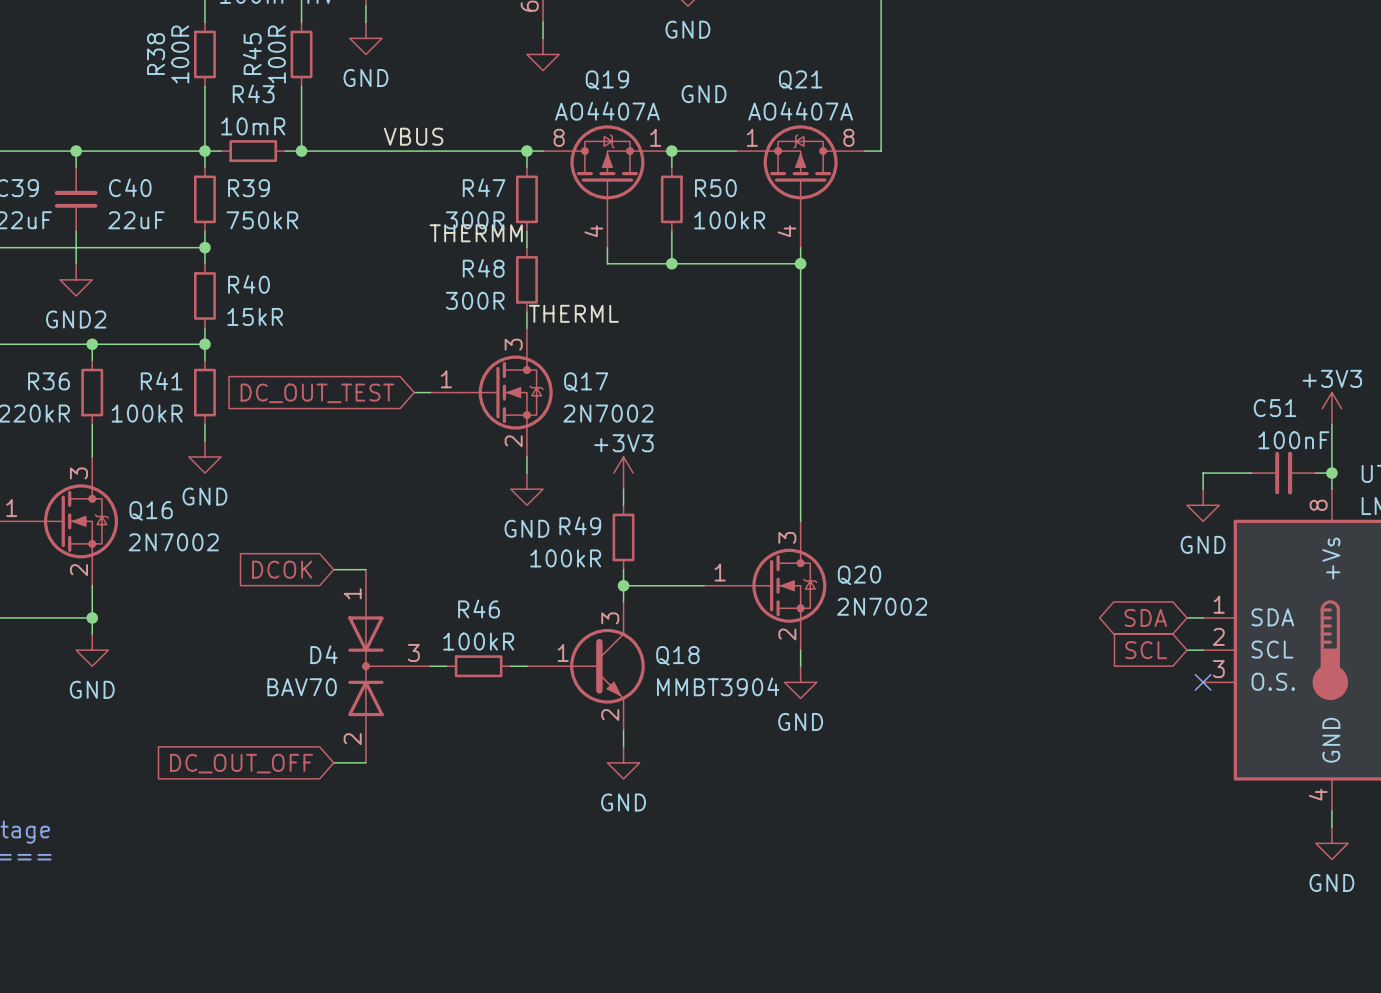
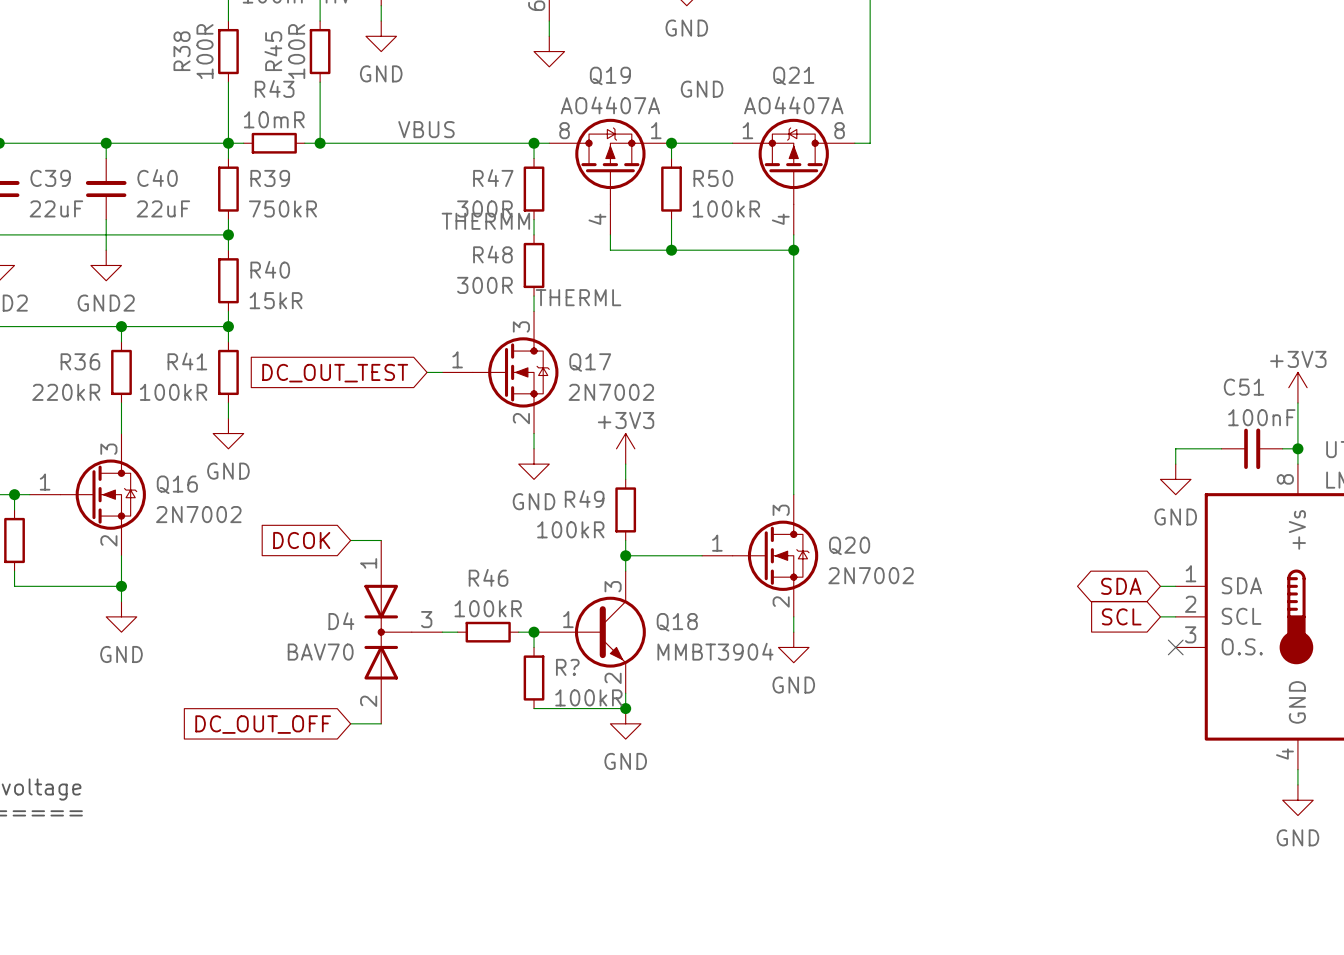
wire: none -> (534, 632) (534, 647)
junction: none -> (534, 632)
R?: none -> 100kR (534, 678)
wire: none -> (534, 708) (625, 708)
junction: none -> (625, 708)

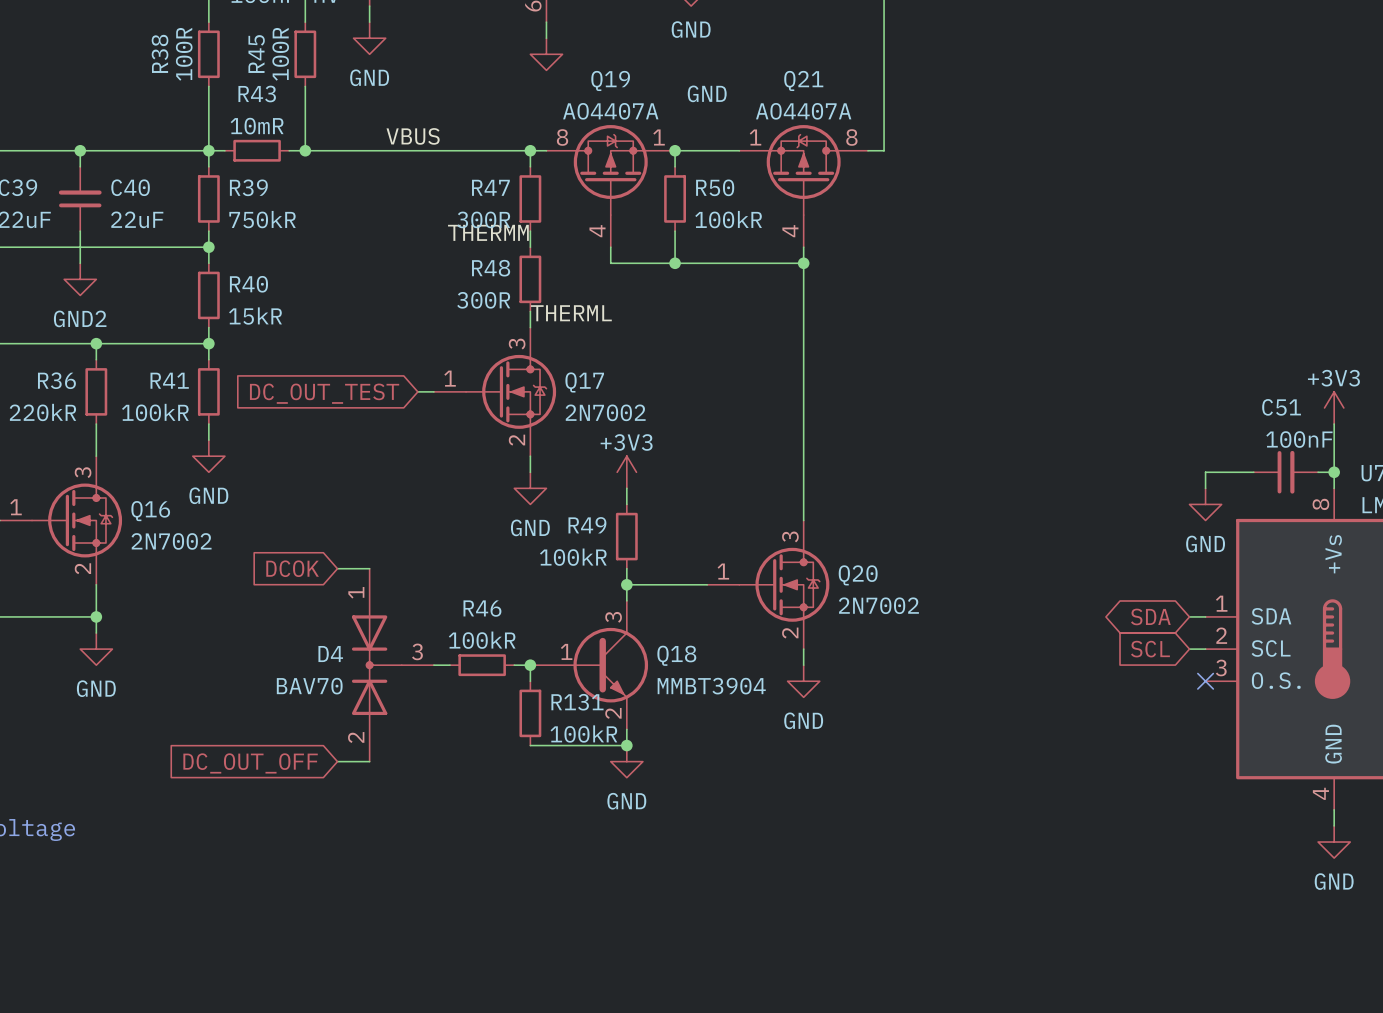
R? name: R? (567, 667) -> R131 (577, 702)

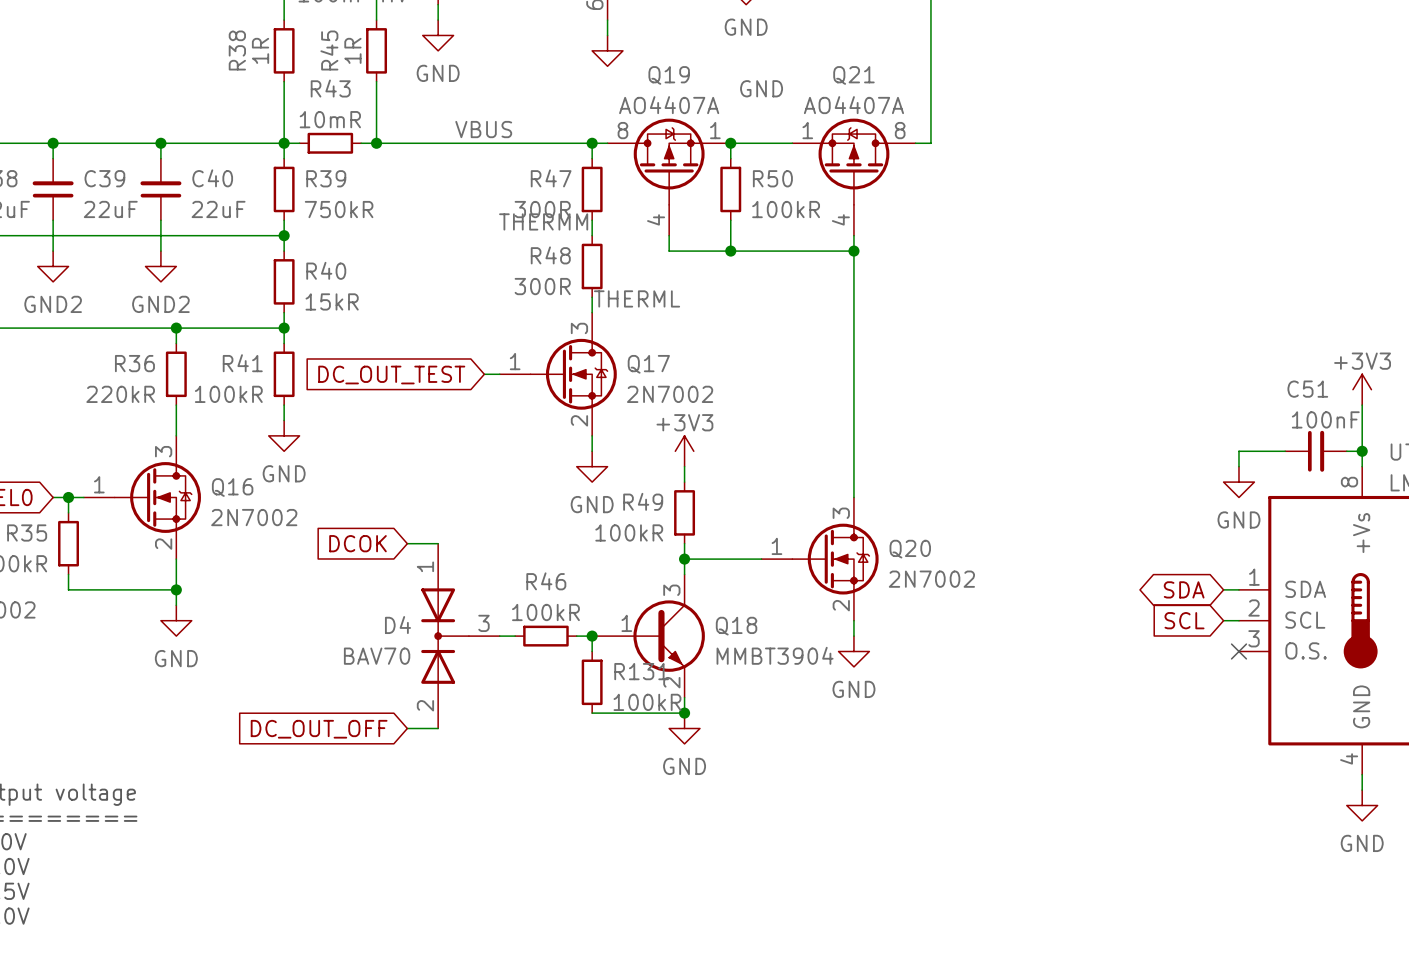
R38 value: 100R (184, 54) -> 1R (260, 50)
R45 value: 100R (280, 54) -> 1R (352, 50)

